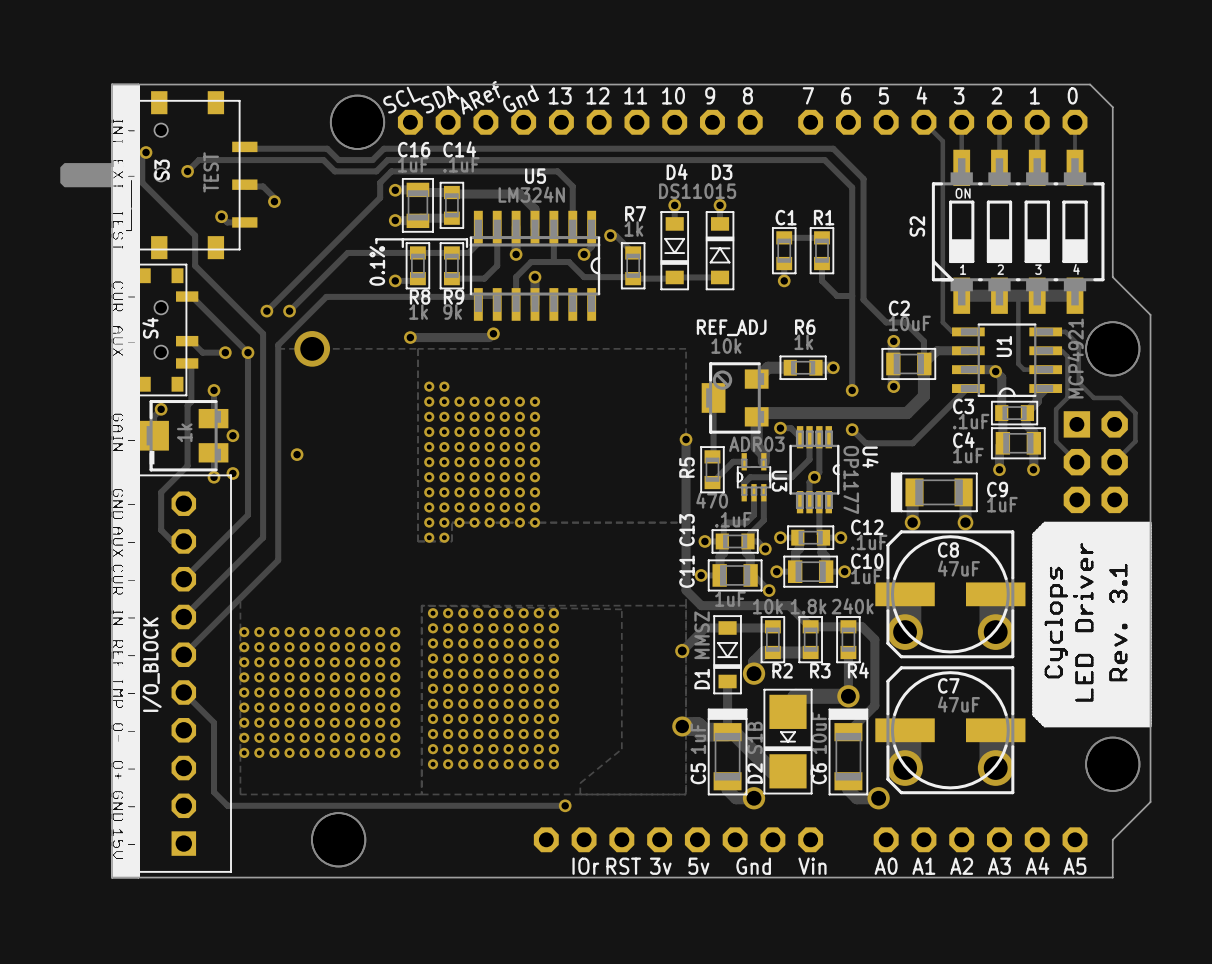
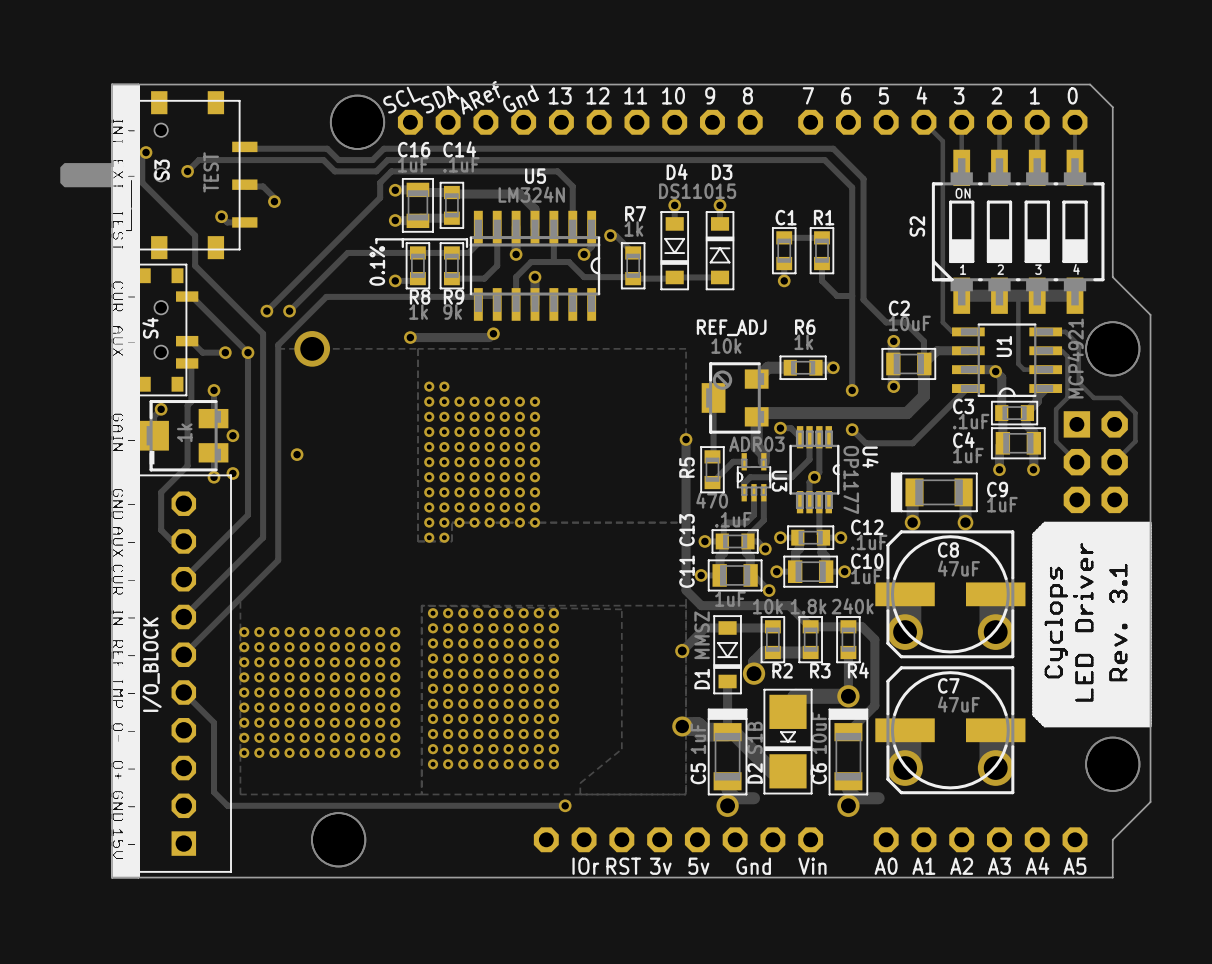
via position: (754, 798) -> (727, 805)
via position: (878, 798) -> (848, 805)

